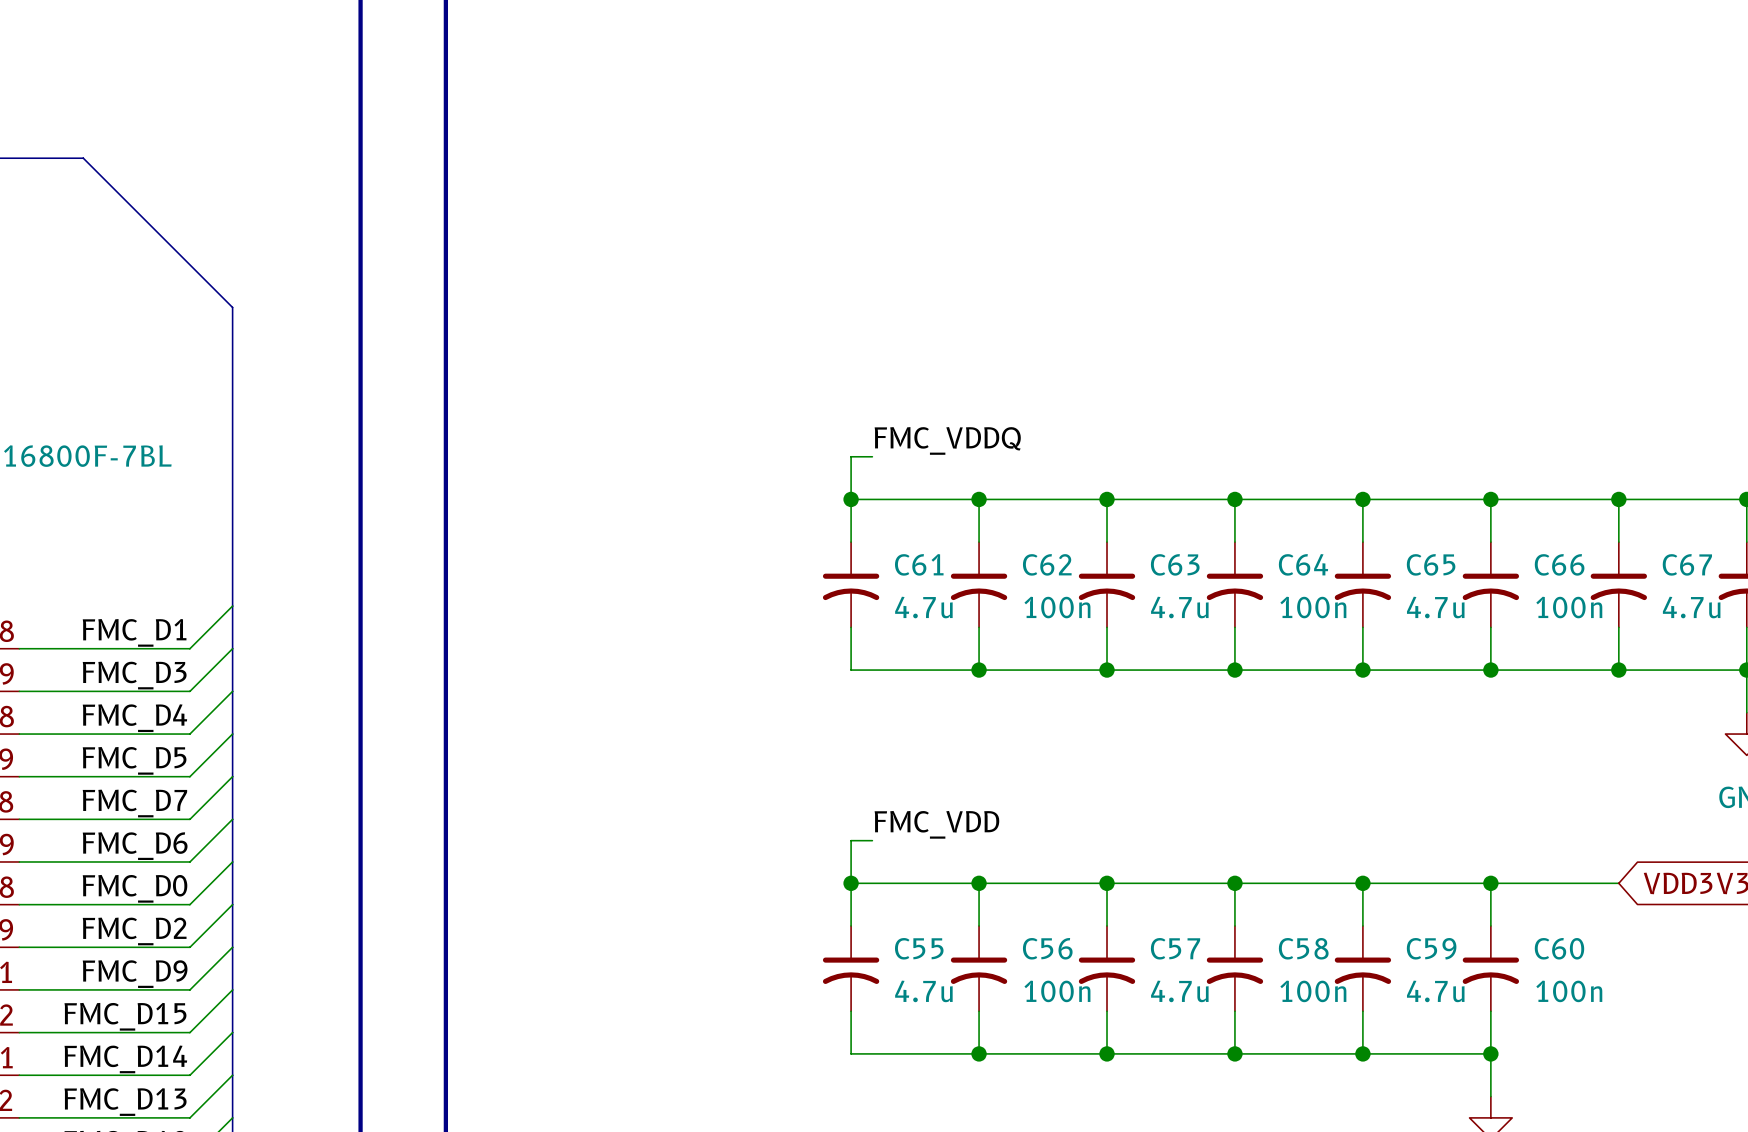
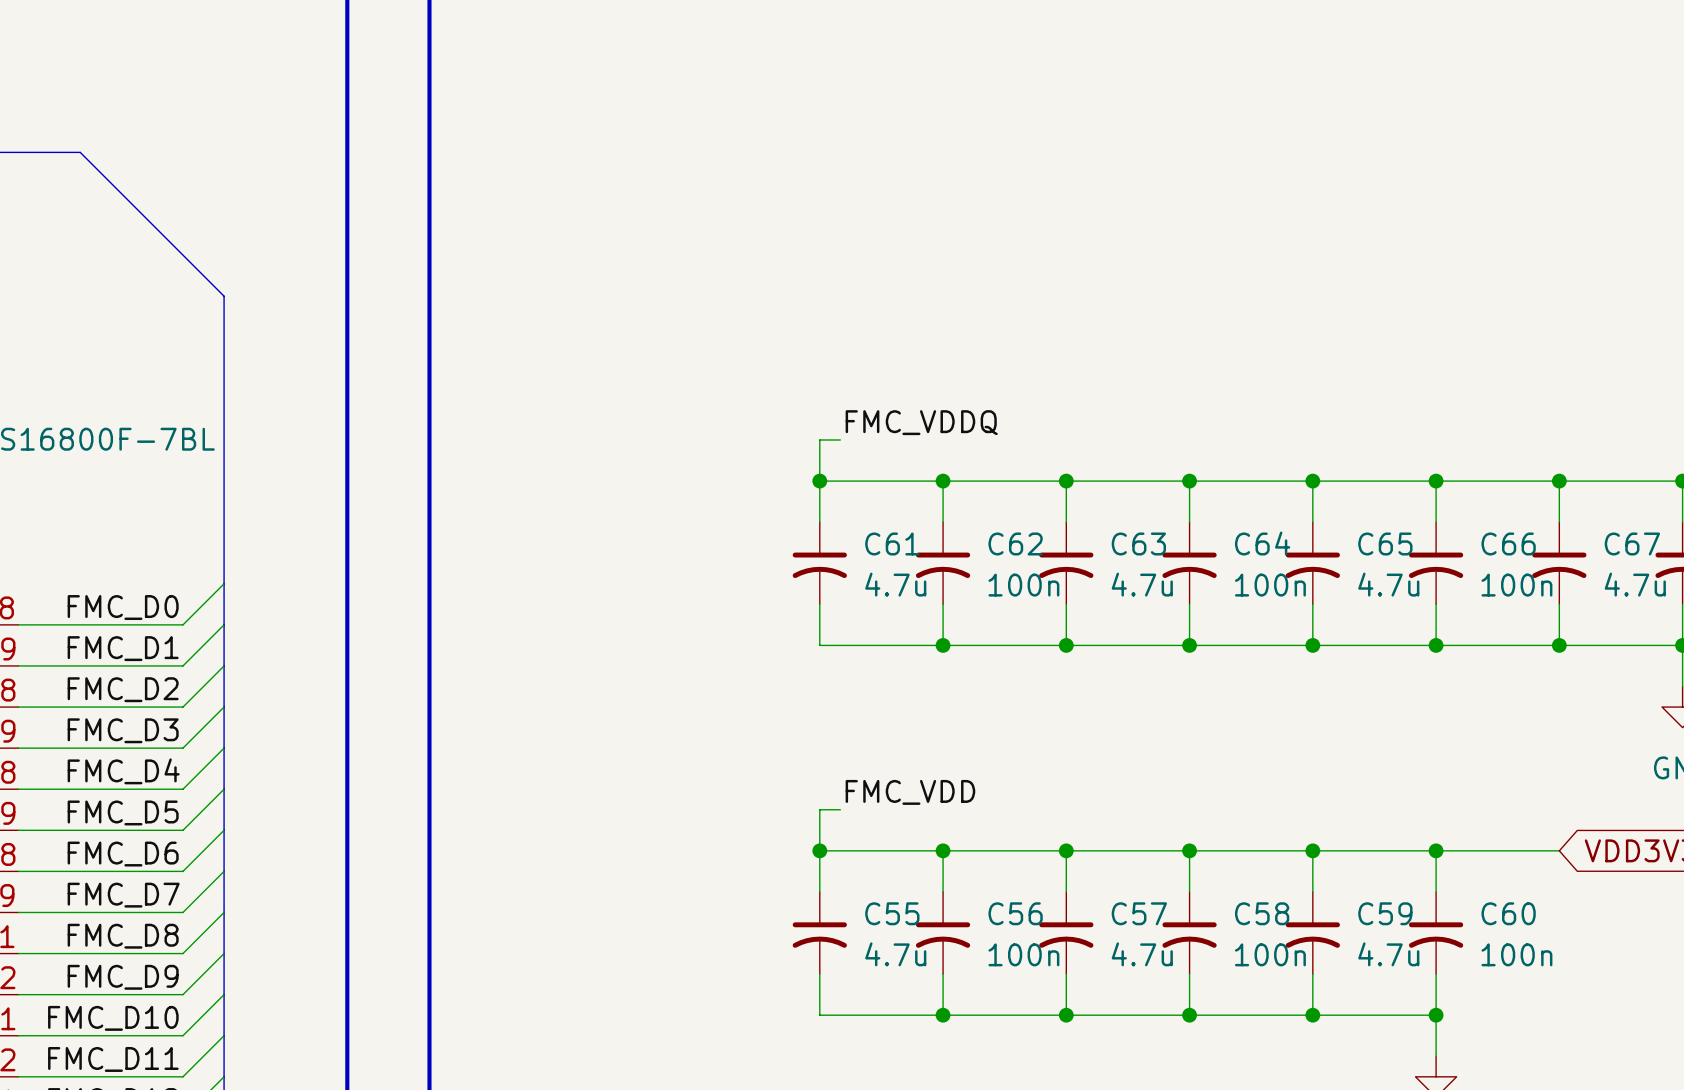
label: FMC_D1 (134, 632) -> FMC_D0 (123, 607)
label: FMC_D3 (134, 675) -> FMC_D1 (123, 648)
label: FMC_D4 (134, 718) -> FMC_D2 (123, 689)
label: FMC_D5 (134, 760) -> FMC_D3 (123, 730)
label: FMC_D7 (134, 803) -> FMC_D4 (123, 771)
label: FMC_D6 (135, 846) -> FMC_D5 (123, 812)
label: FMC_D0 (135, 888) -> FMC_D6 (123, 854)
label: FMC_D2 (134, 931) -> FMC_D7 (123, 895)
label: FMC_D9 (135, 974) -> FMC_D8 (123, 936)
label: FMC_D15 (125, 1016) -> FMC_D9 (123, 977)
label: FMC_D14 (125, 1059) -> FMC_D10 (113, 1018)
label: FMC_D13 (125, 1102) -> FMC_D11 (113, 1059)

